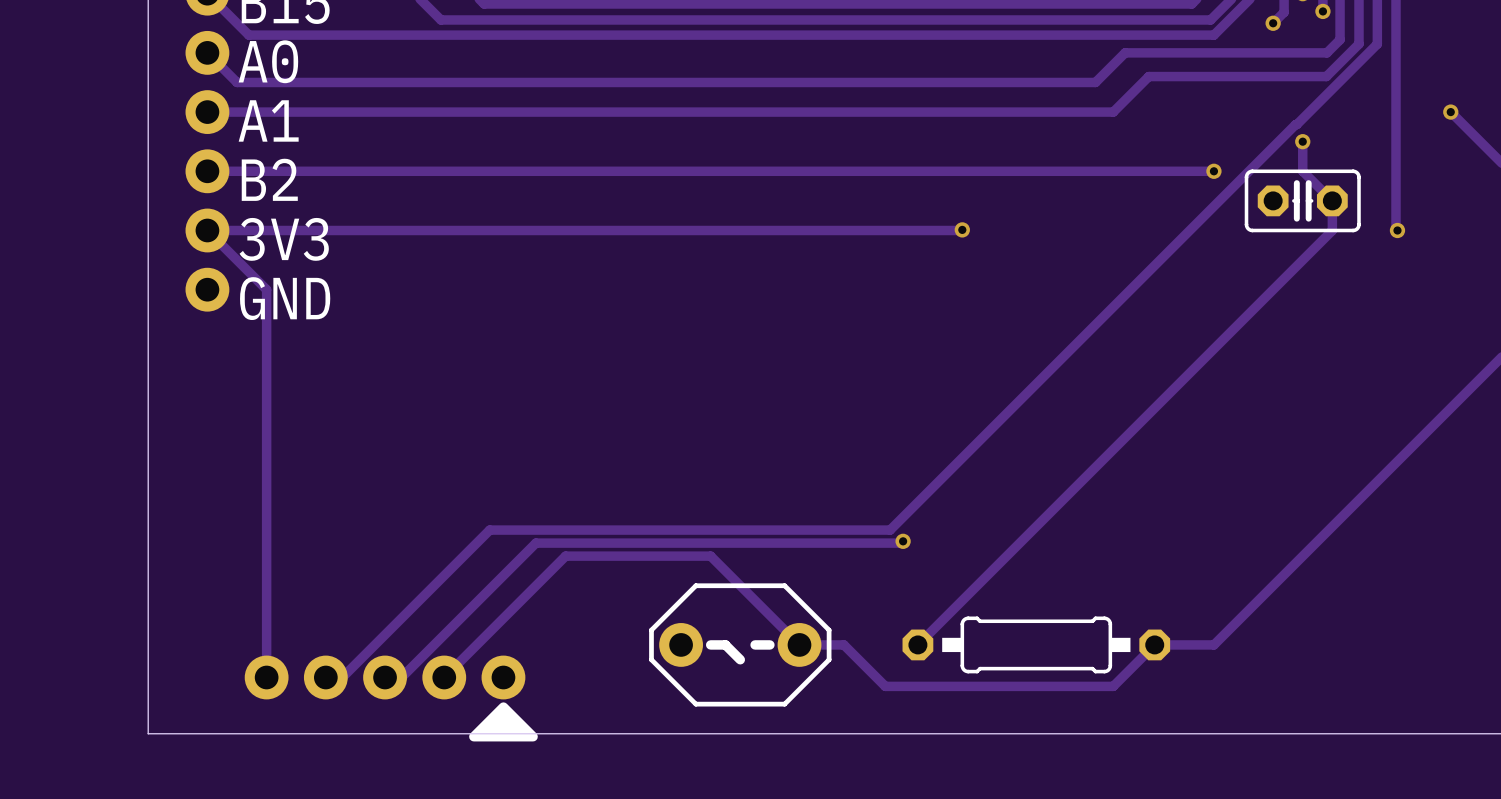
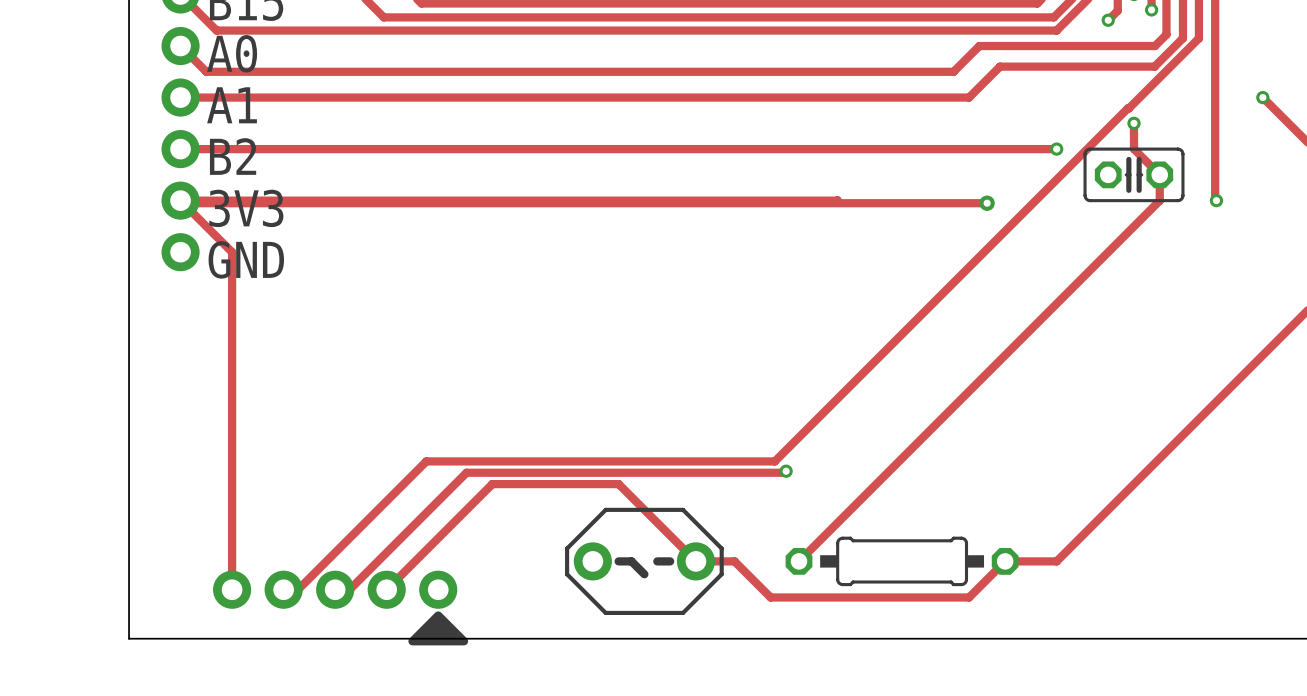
via: (962, 229) -> none
track: none -> (183, 203) (987, 203)
via: none -> (987, 203)

